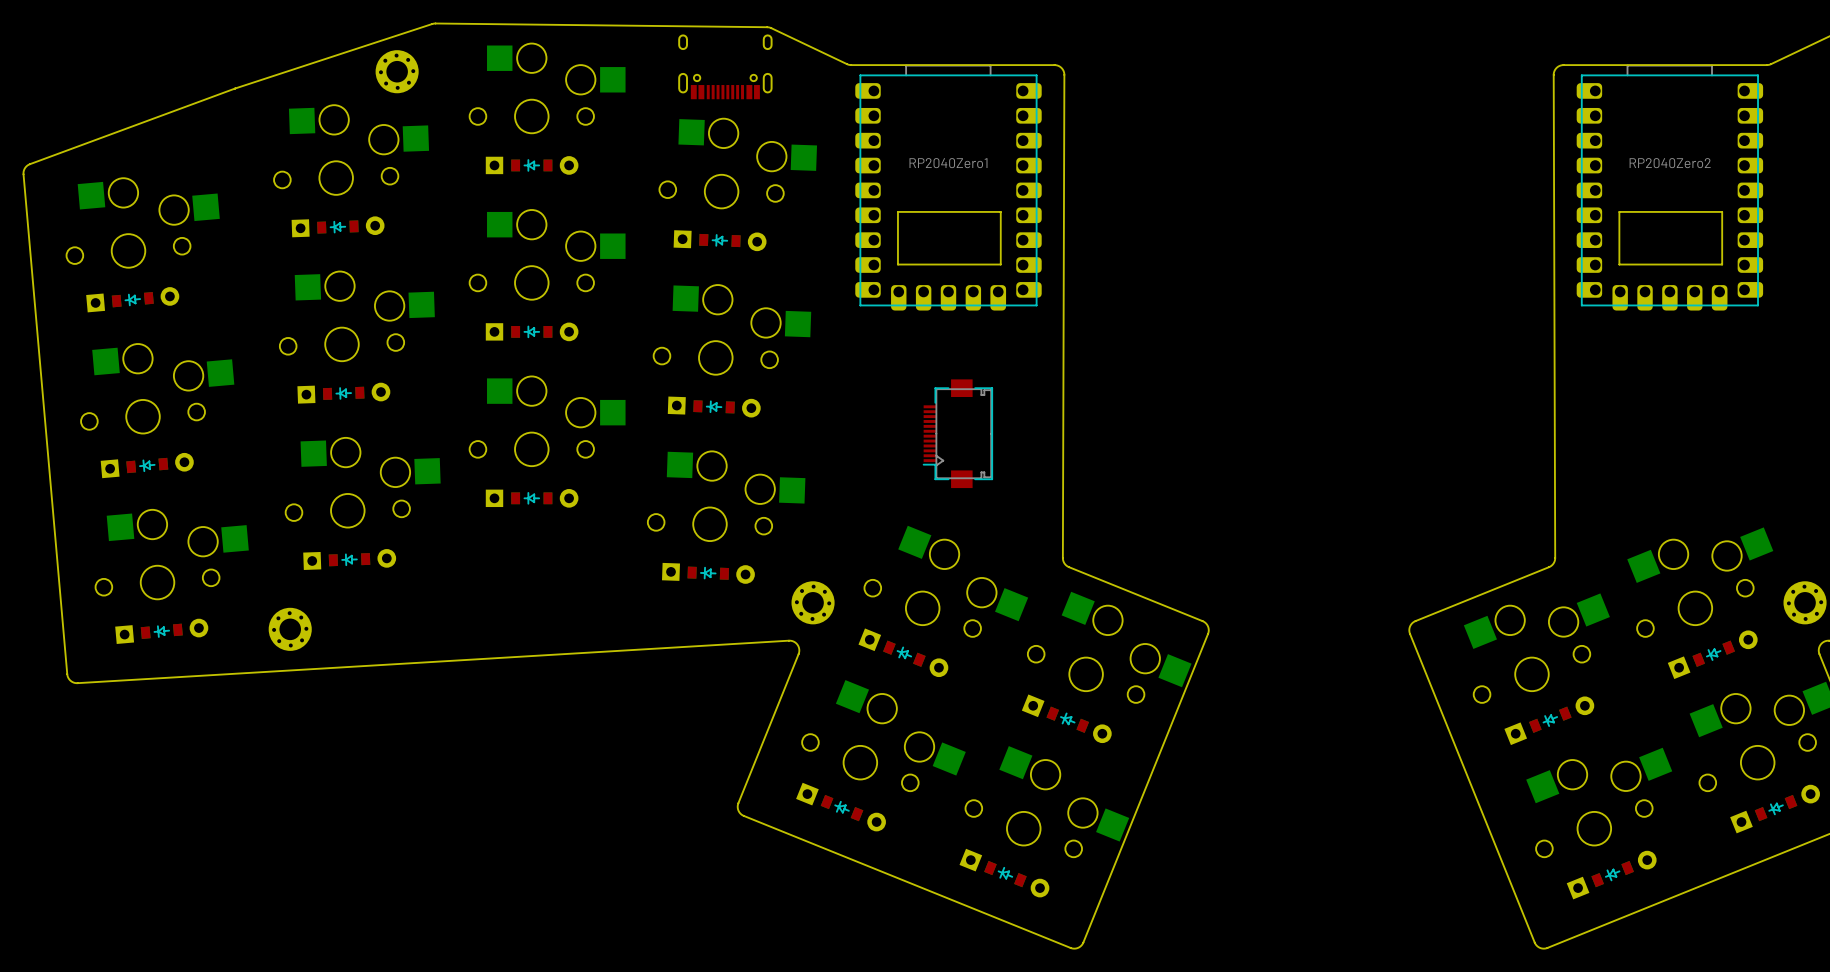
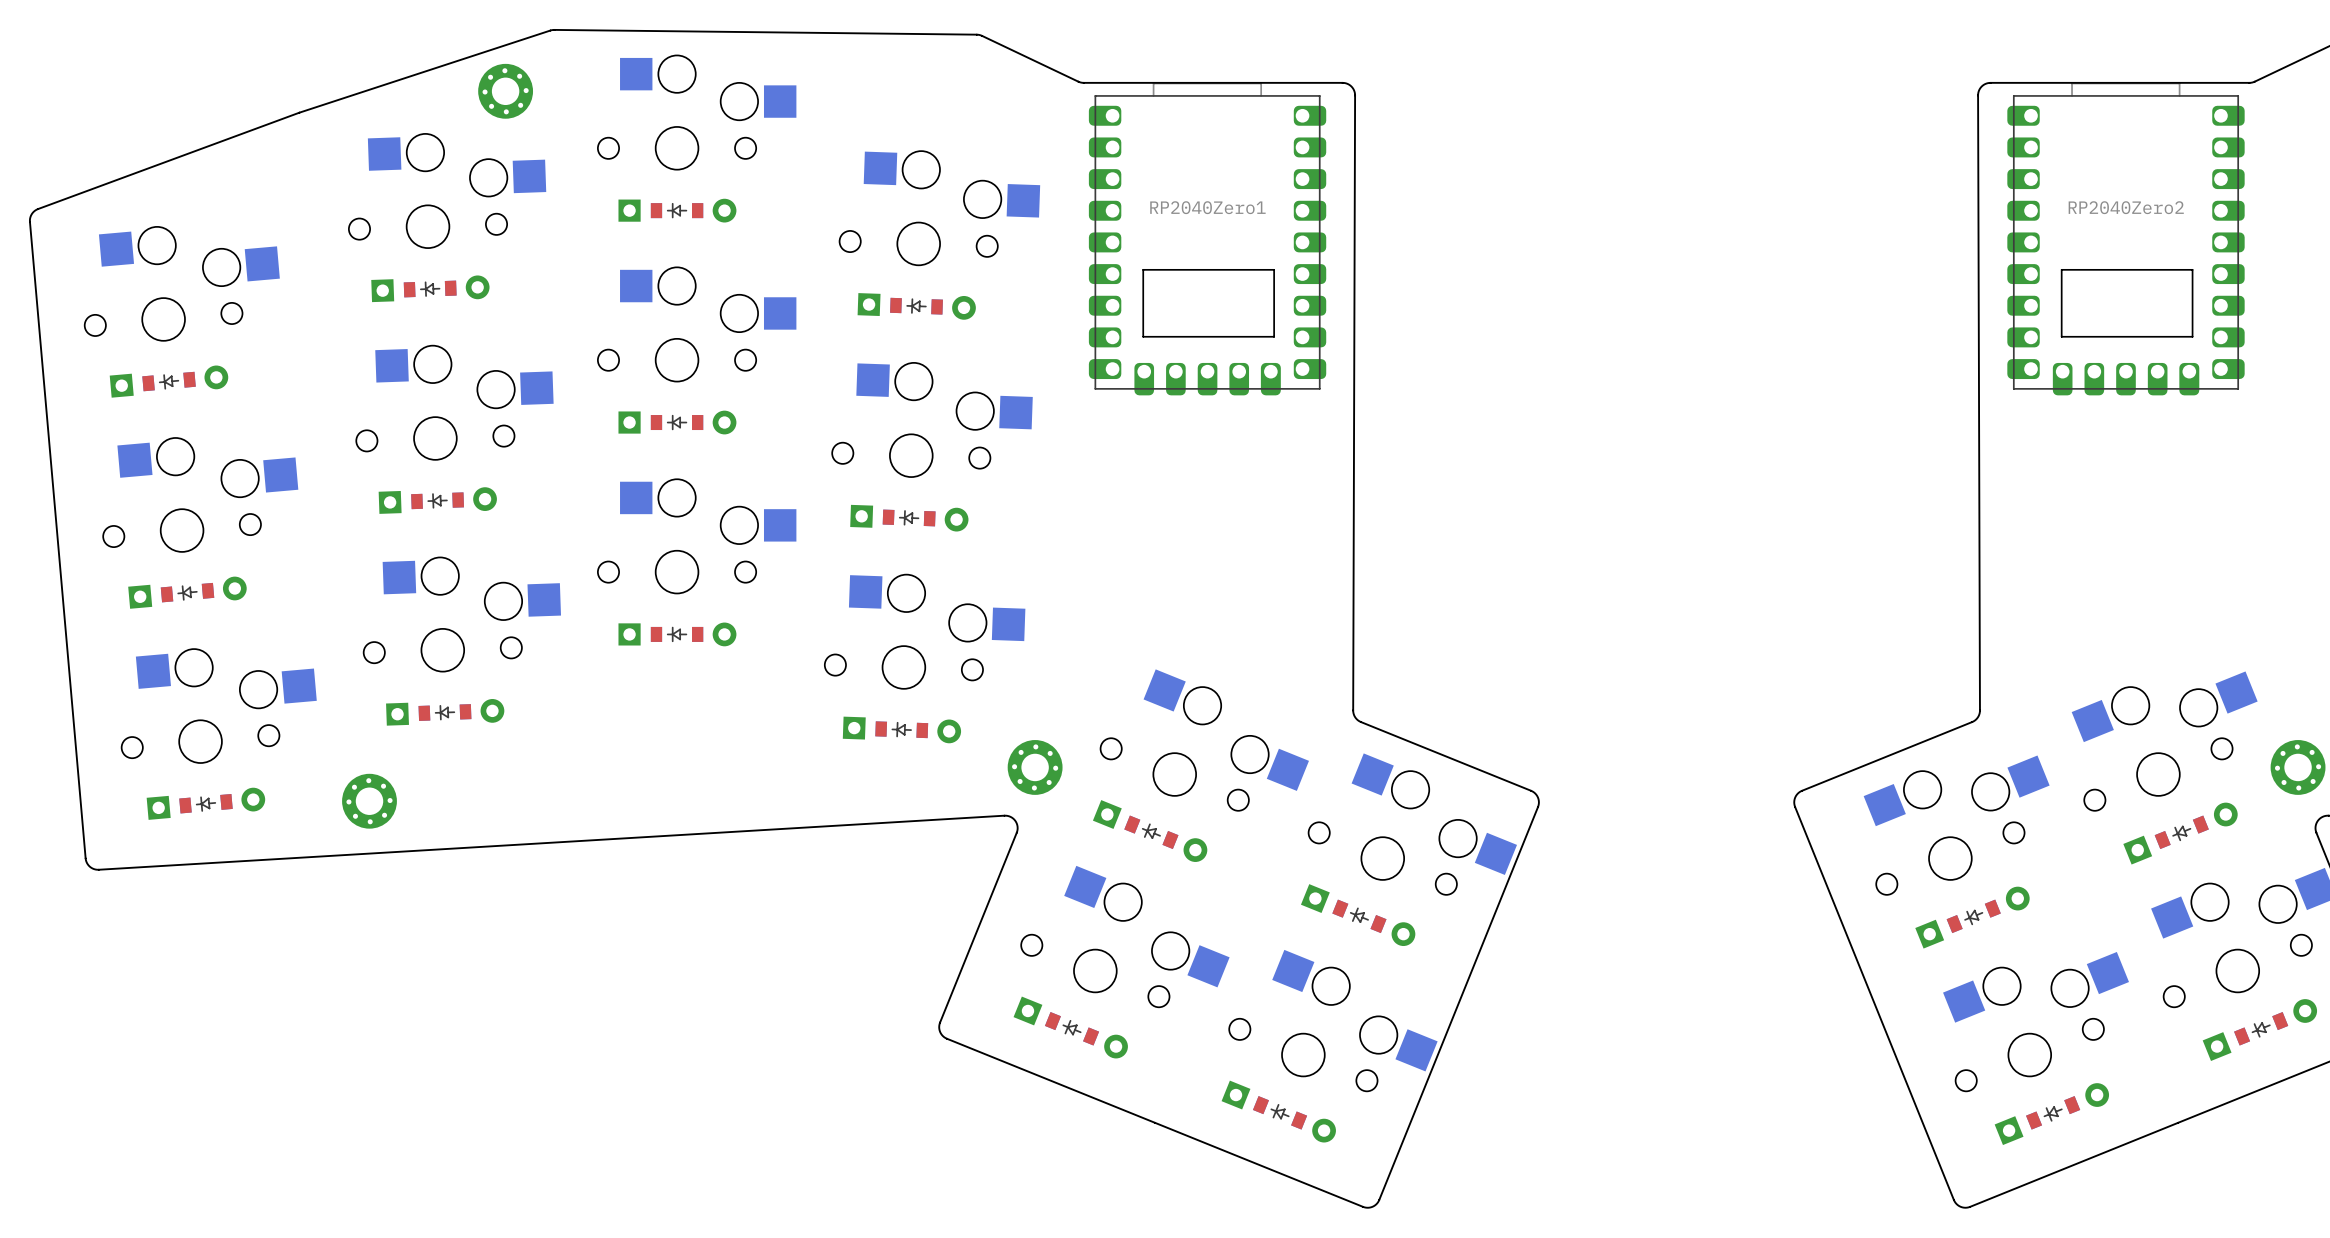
part: (725, 66) -> none
part: (957, 433) -> none

